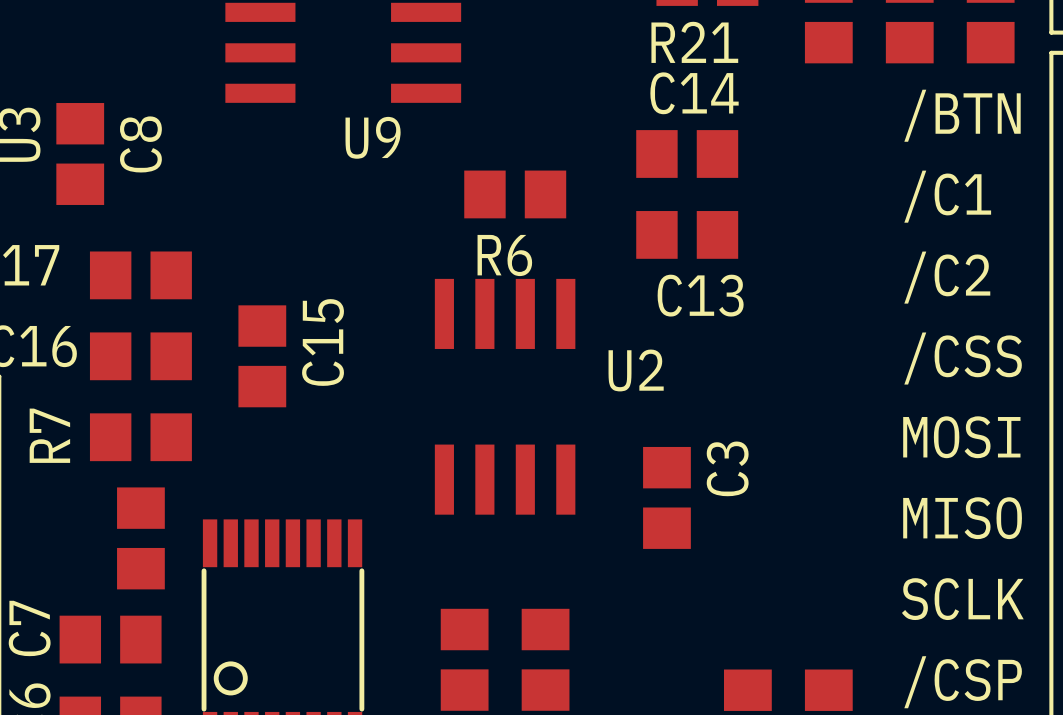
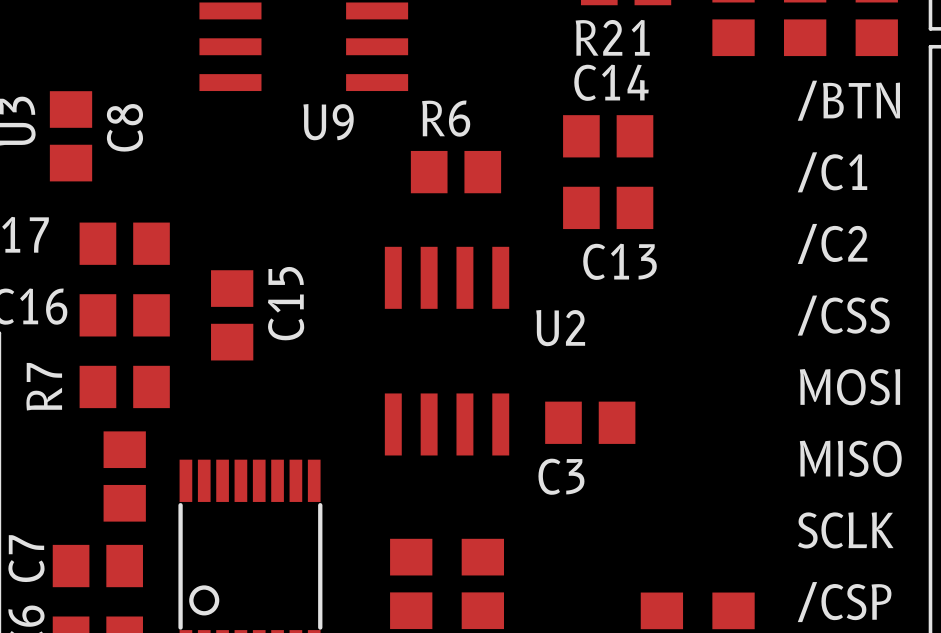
R6 name position: R6 (504, 255) -> R6 (446, 118)
C3 rotation: 0° (666, 497) -> 90° clockwise (590, 422)

